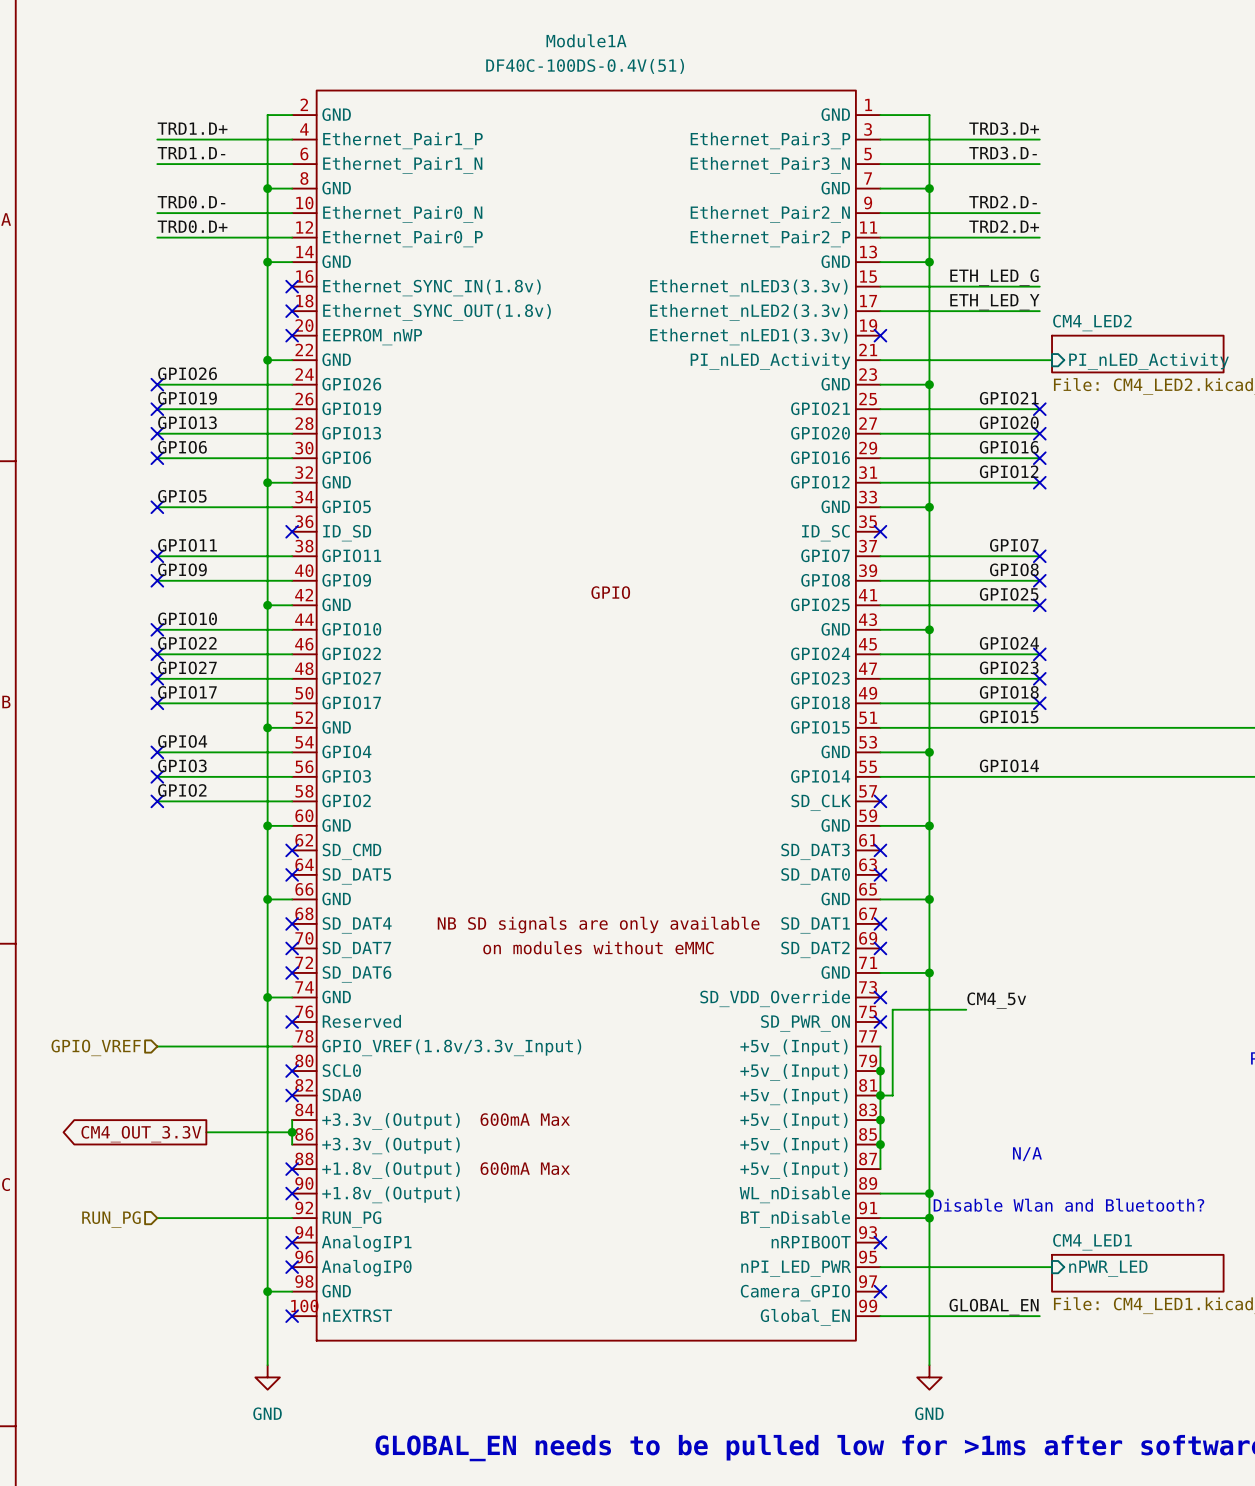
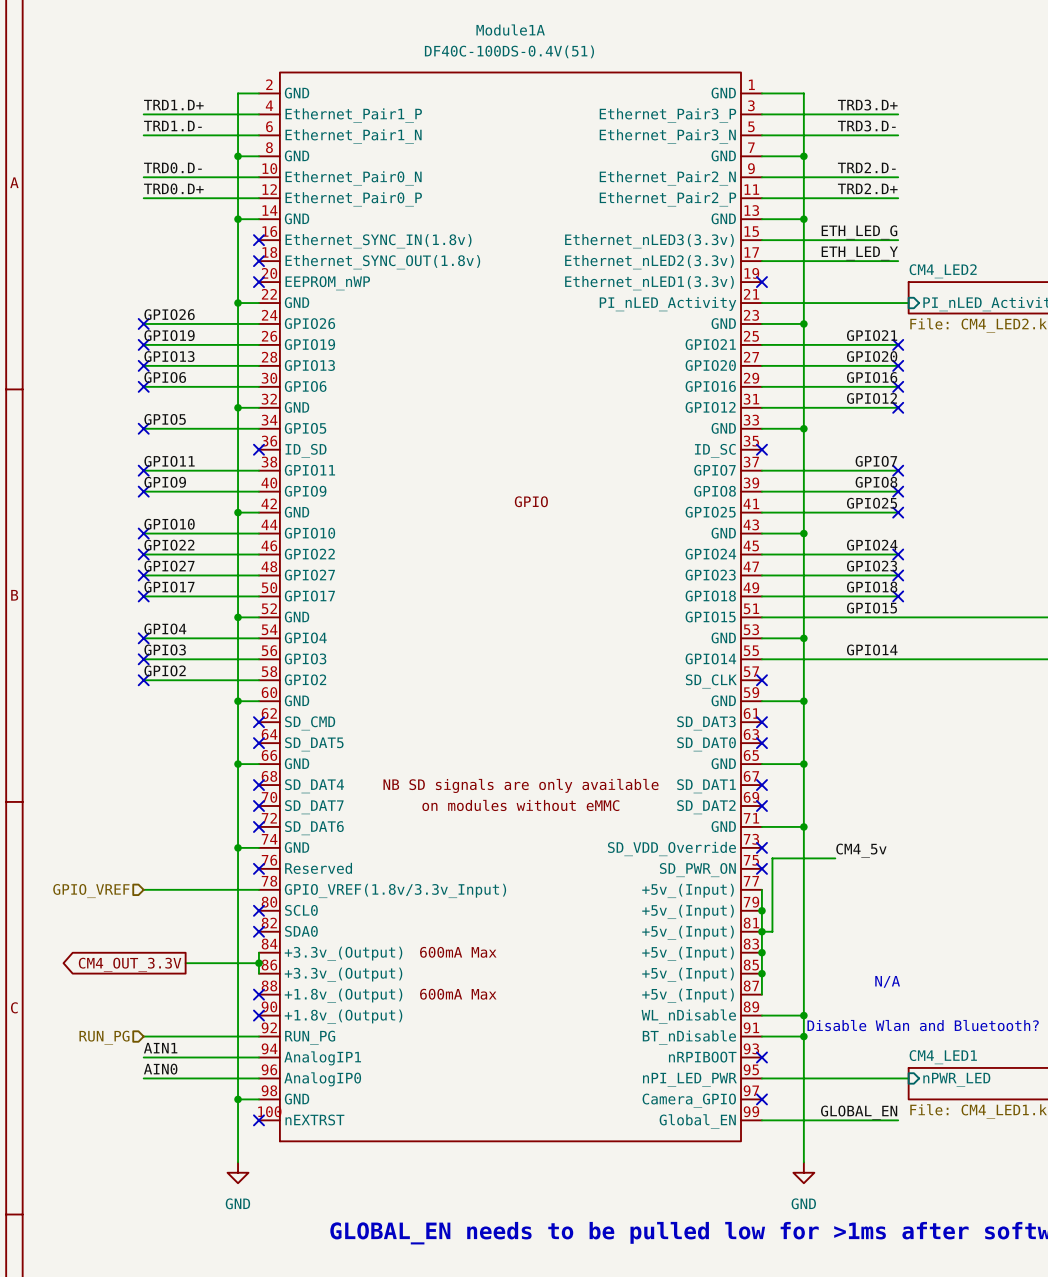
label: none -> AIN1 (160, 1048)
wire: none -> (143, 1057) (258, 1057)
no-connect mark: (292, 1242) -> none
label: none -> AIN0 (160, 1069)
wire: none -> (143, 1078) (258, 1078)
no-connect mark: (292, 1267) -> none

